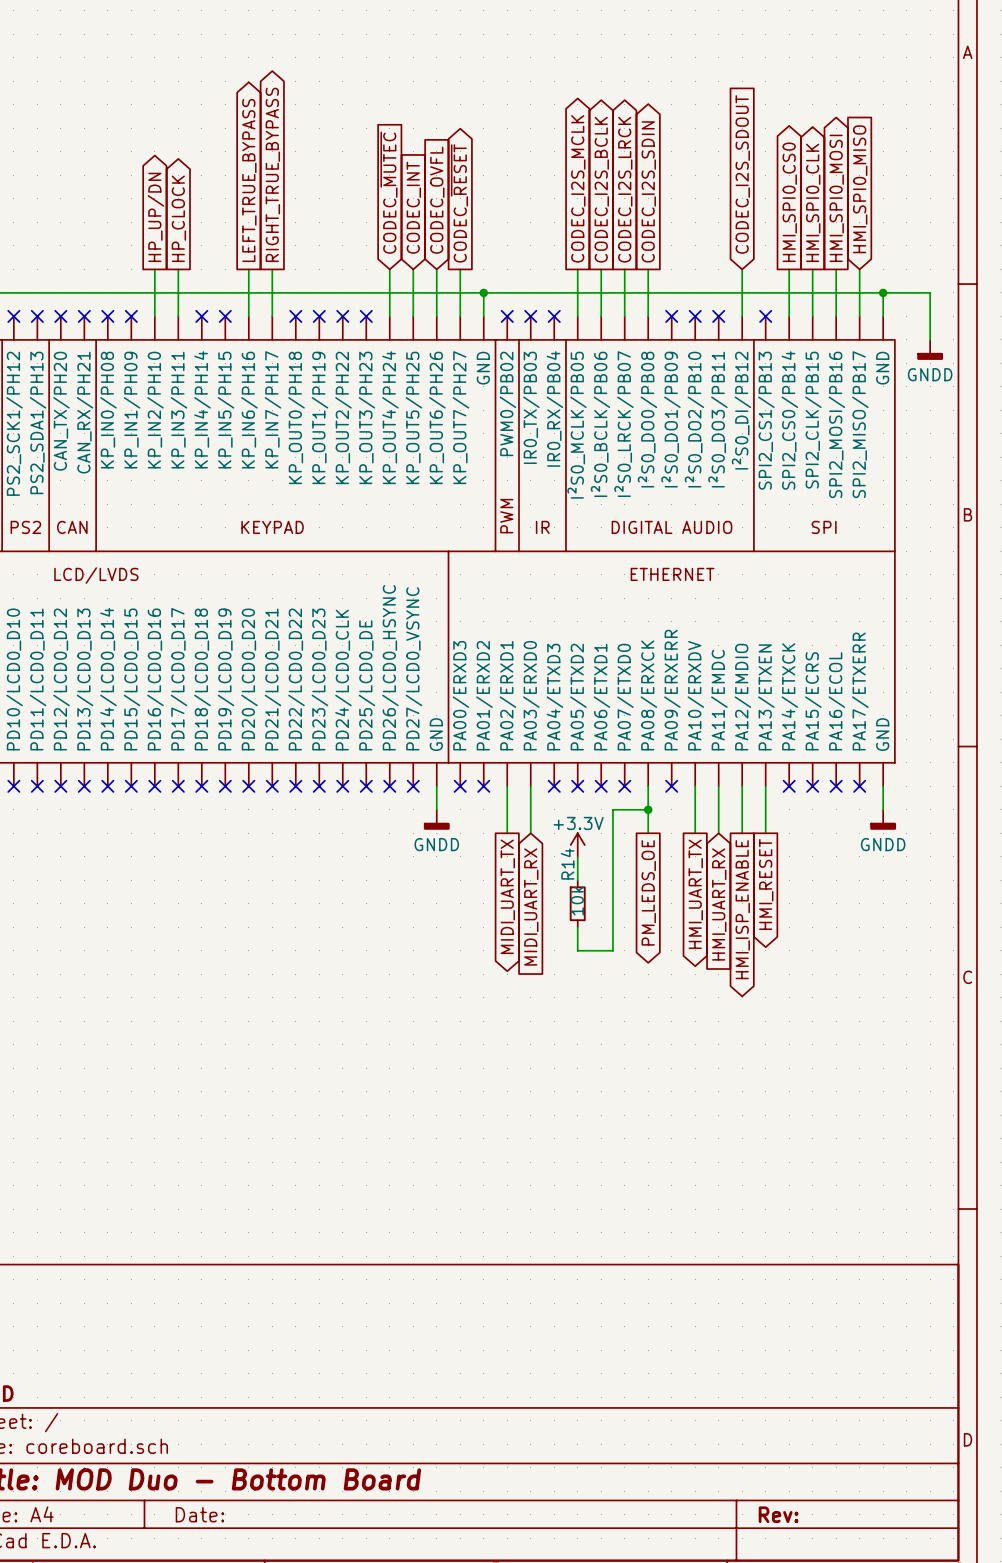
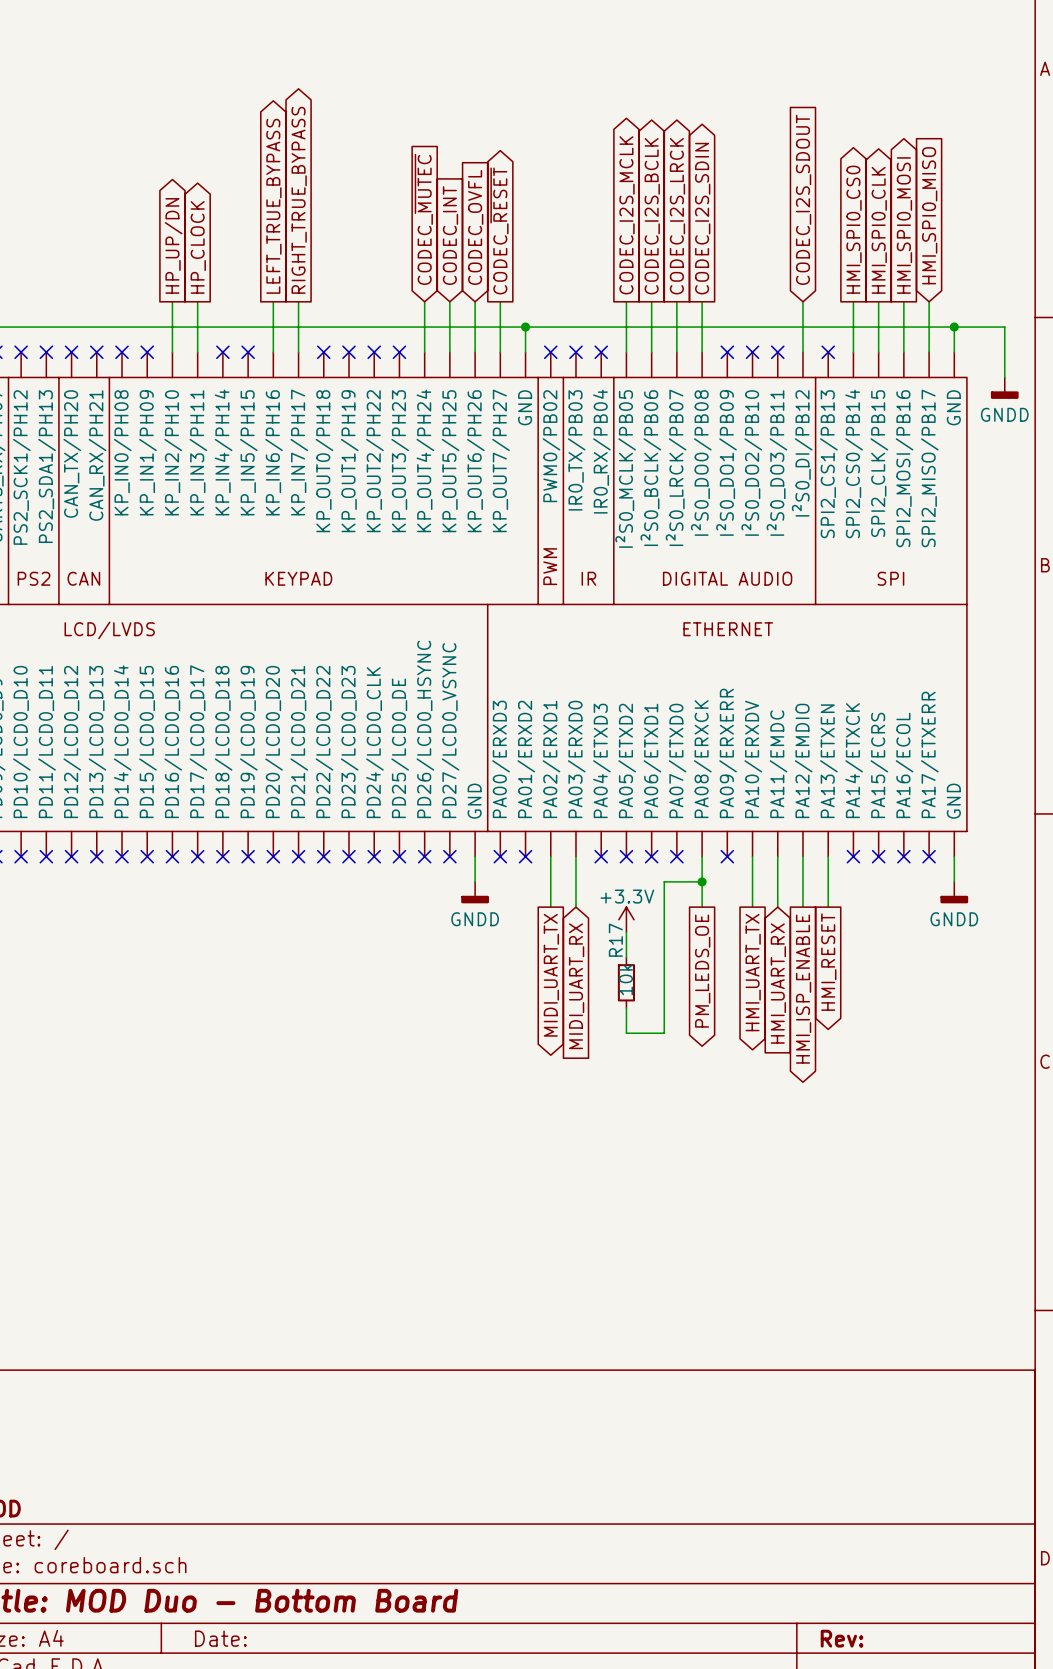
R14 name: R14 (567, 864) -> R17 (615, 940)

